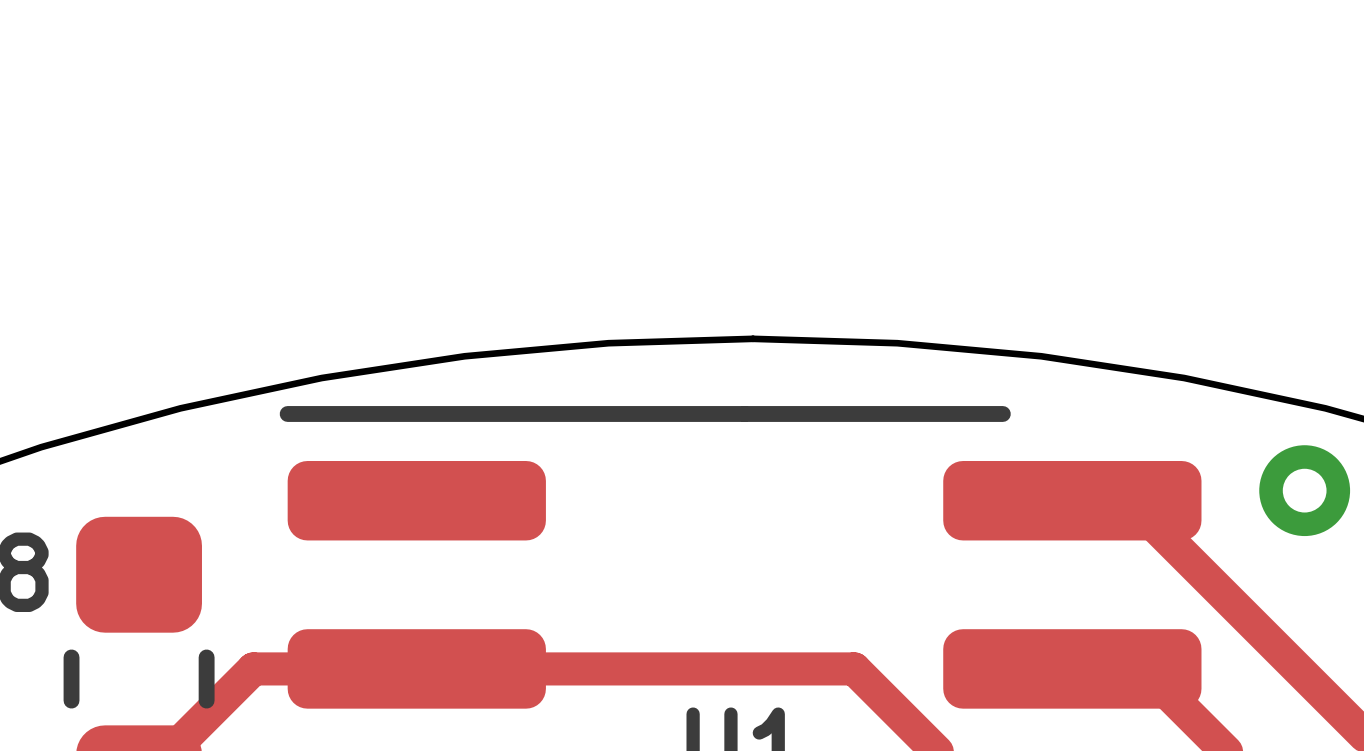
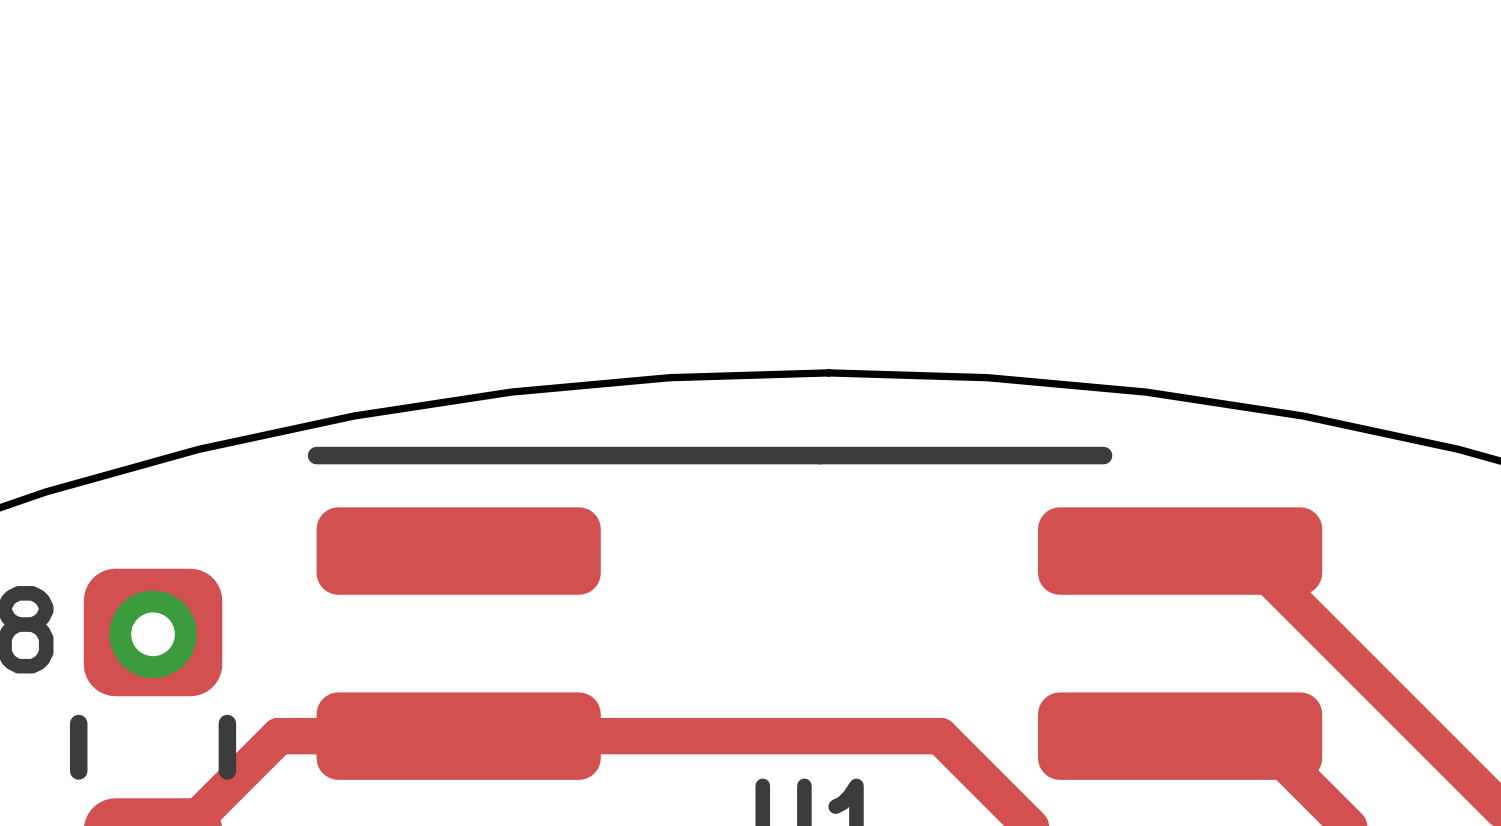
via: (1304, 490) -> none
via: none -> (153, 634)

